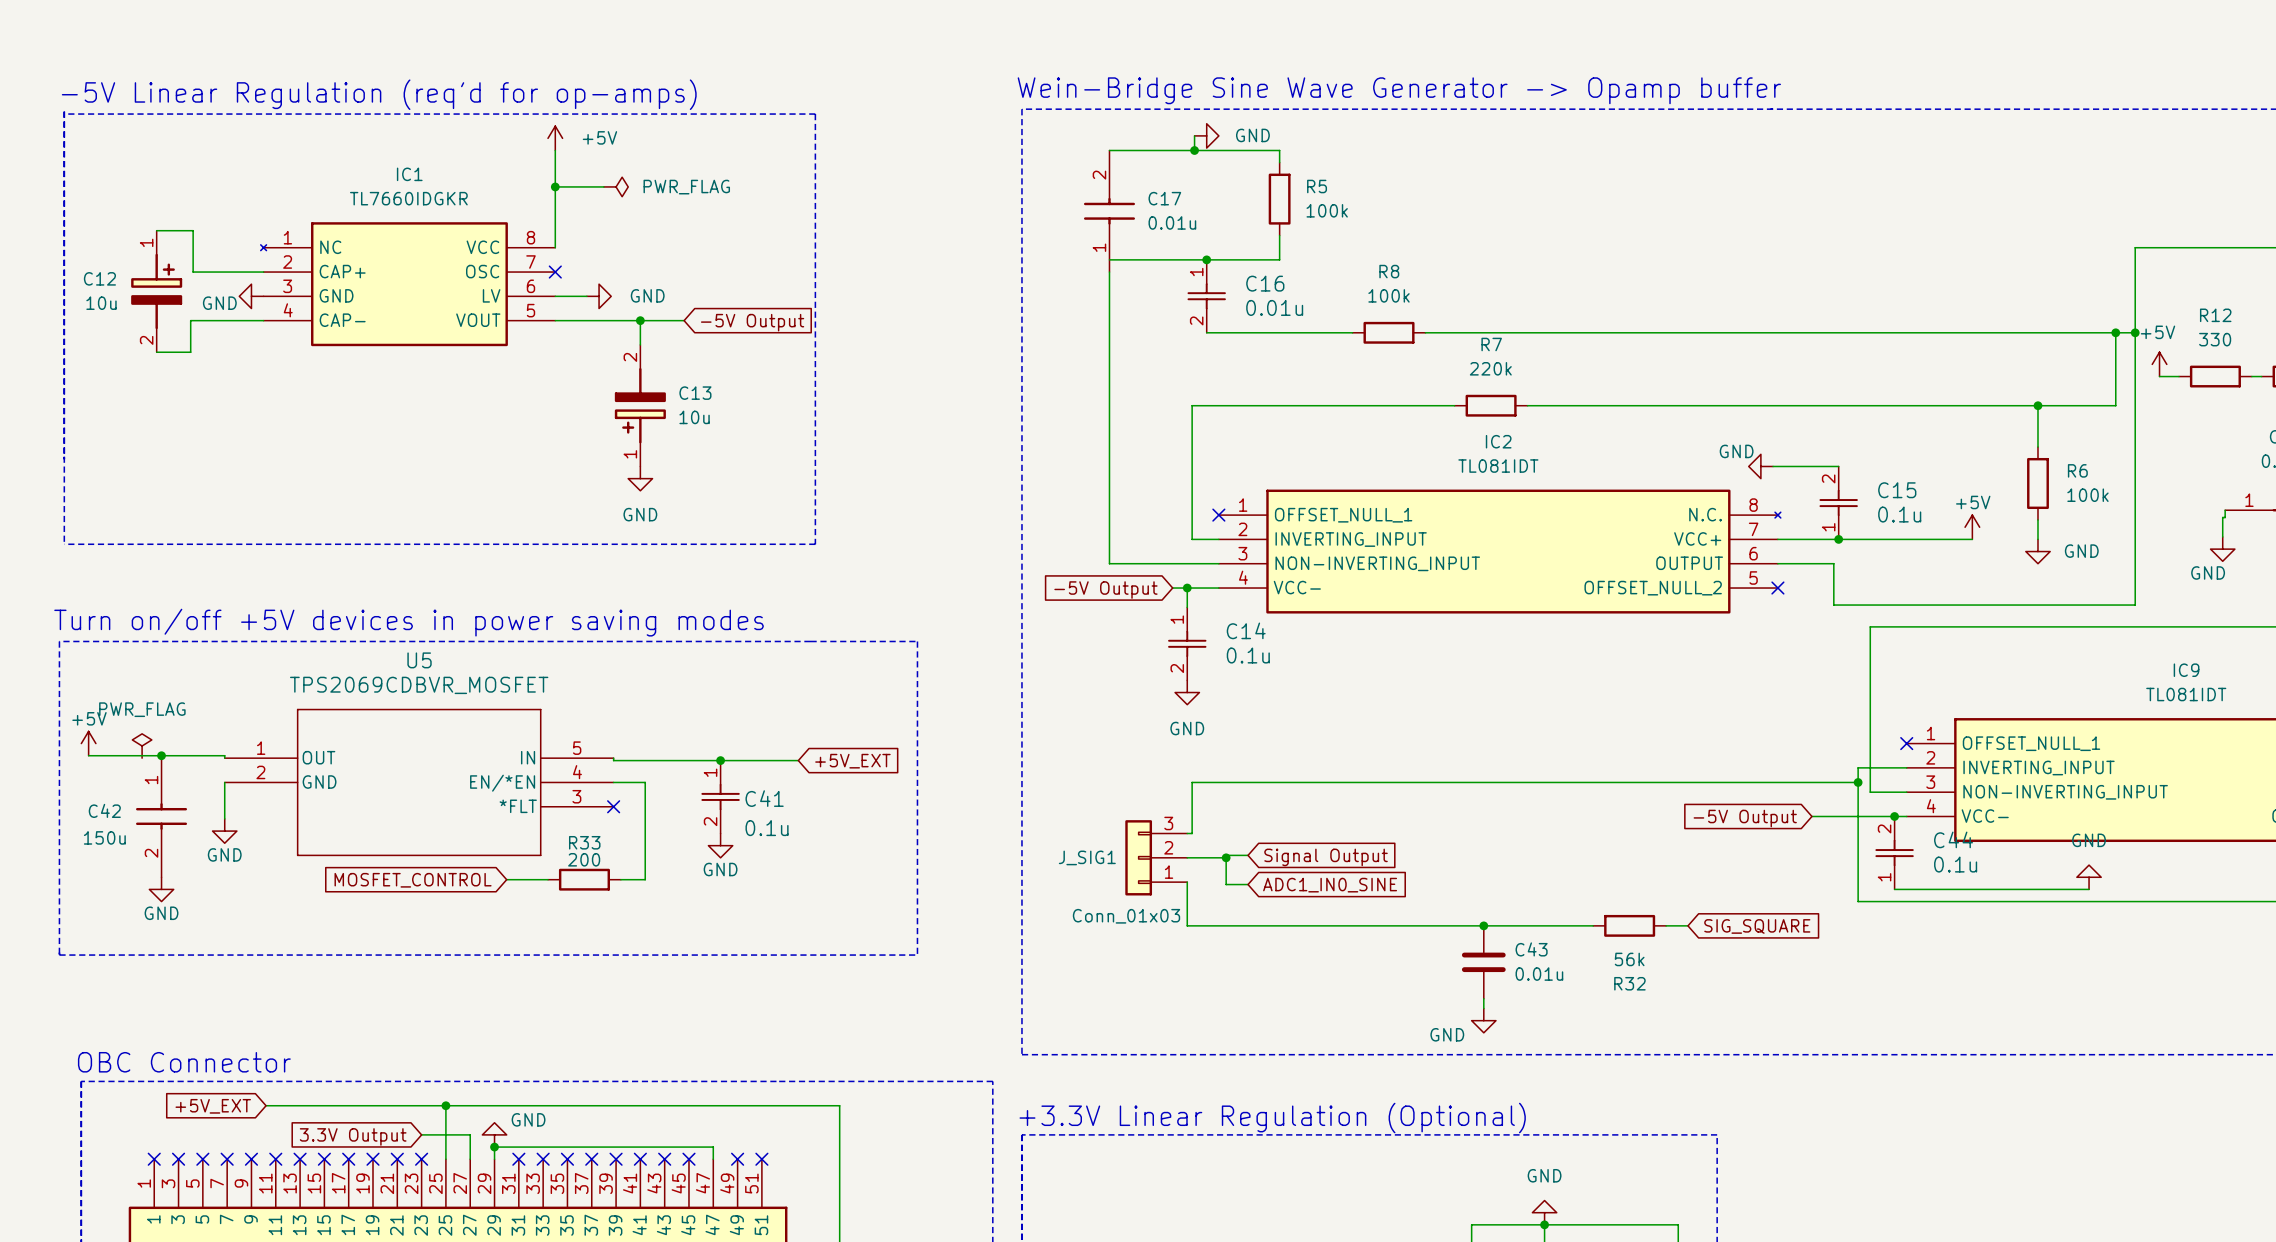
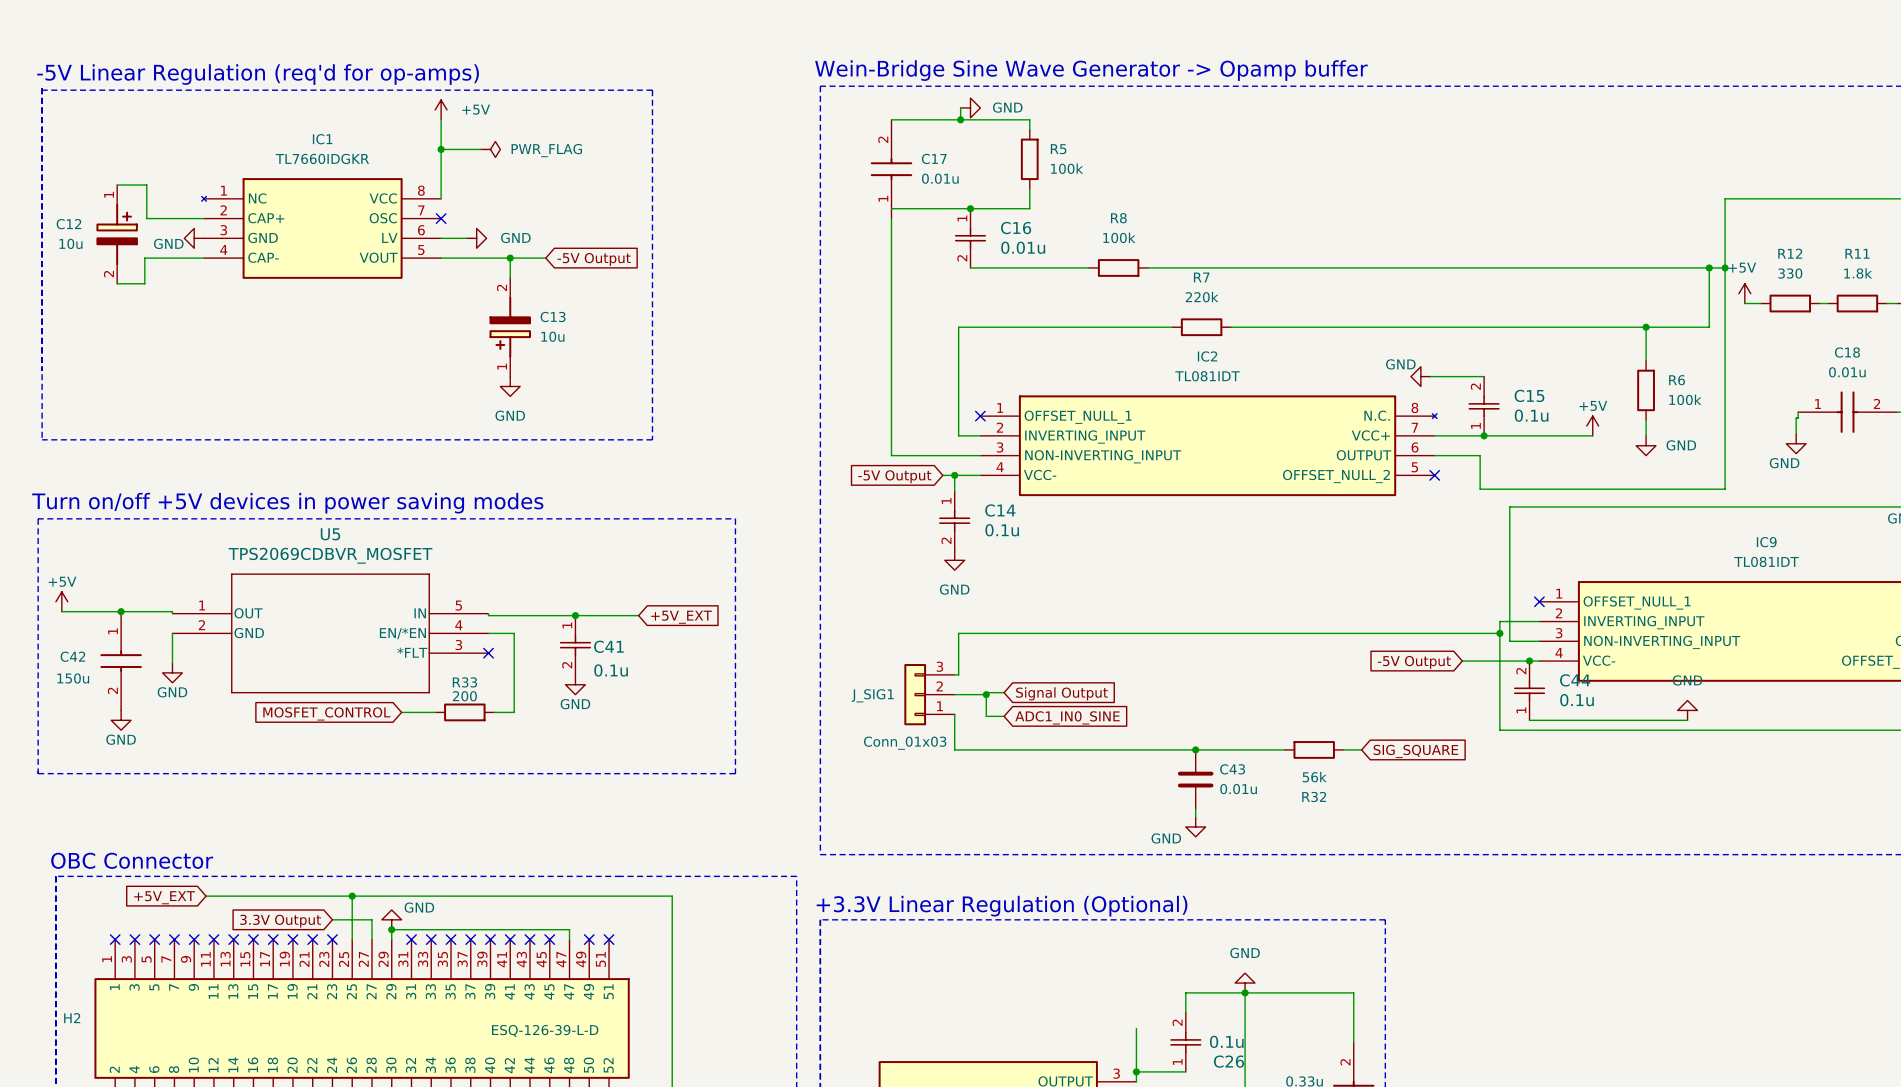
power symbol: PWR_FLAG (142, 746) -> none

